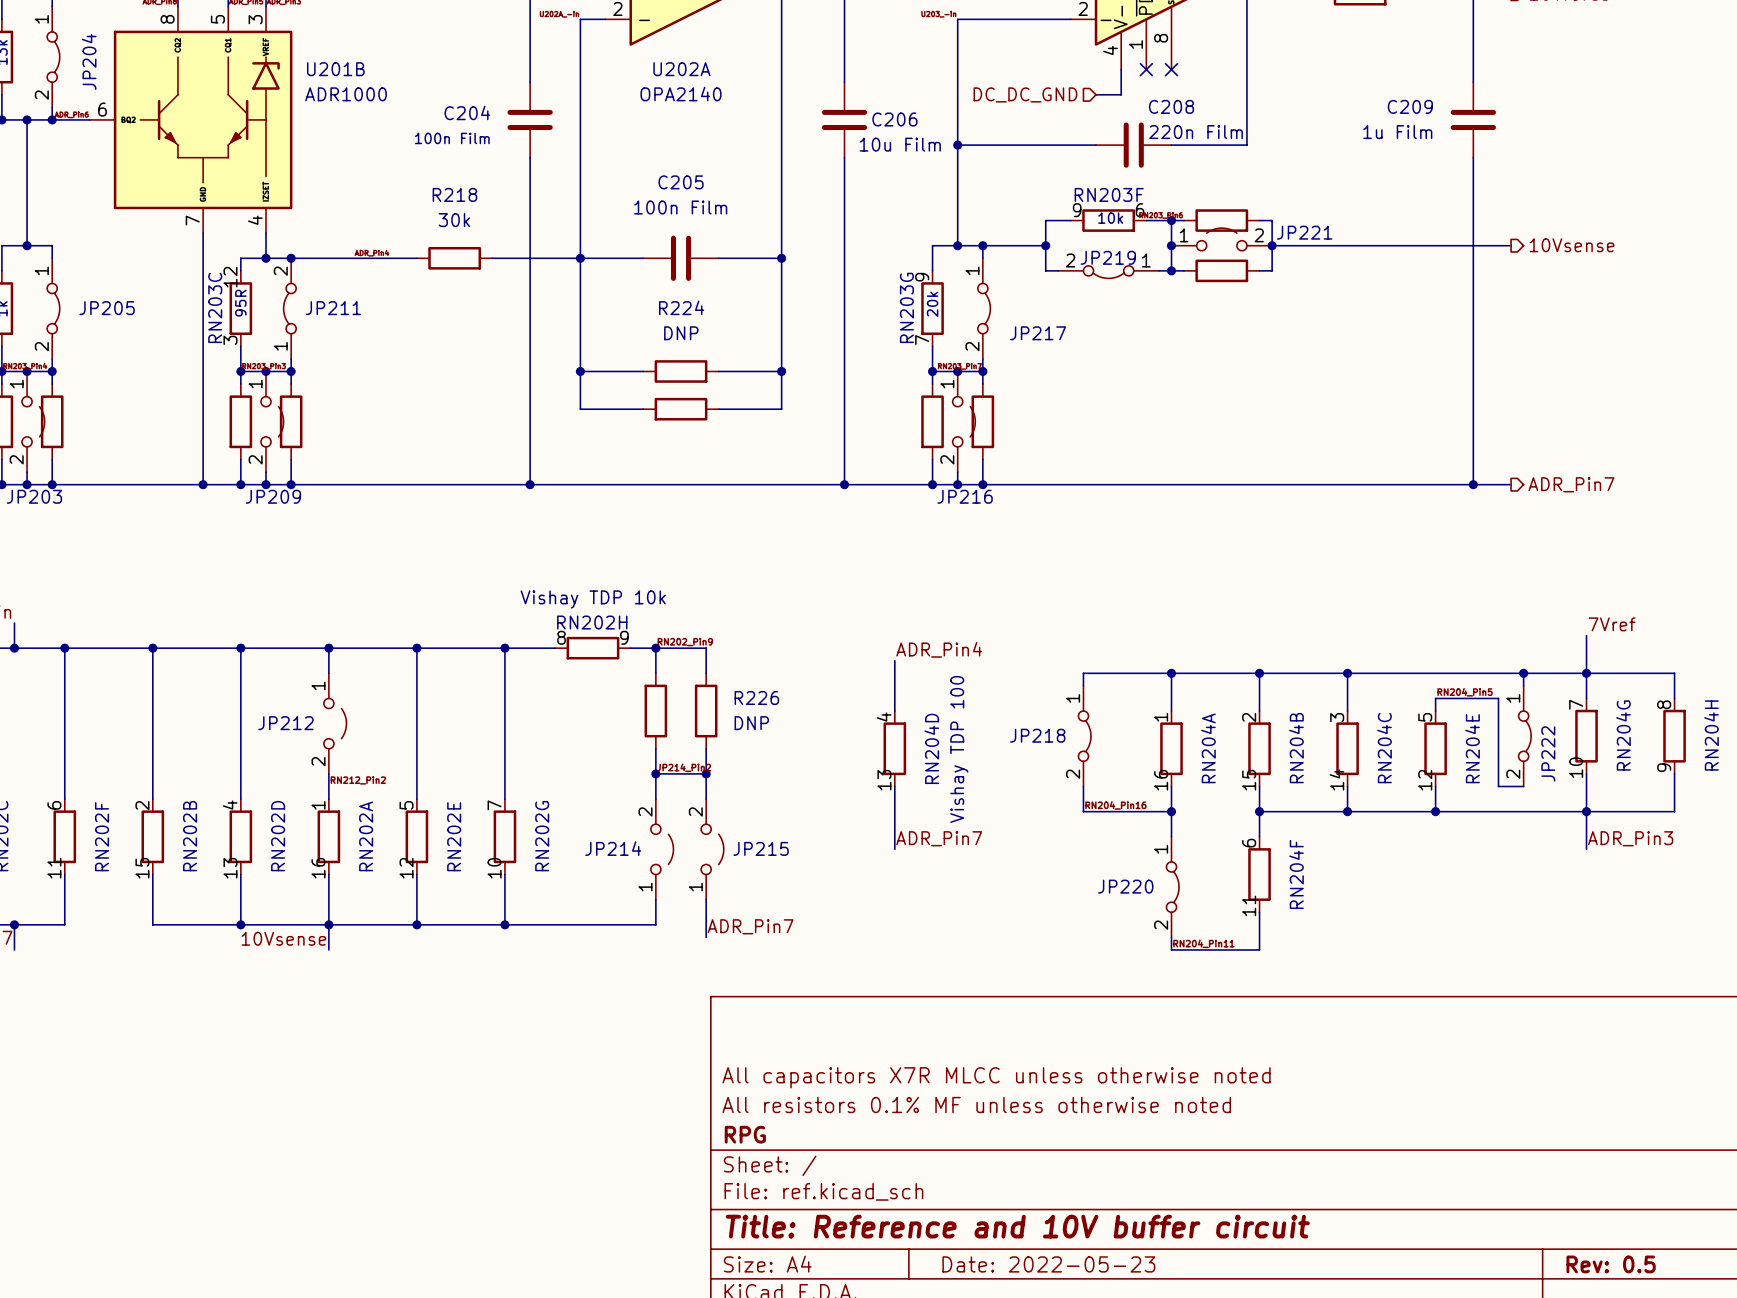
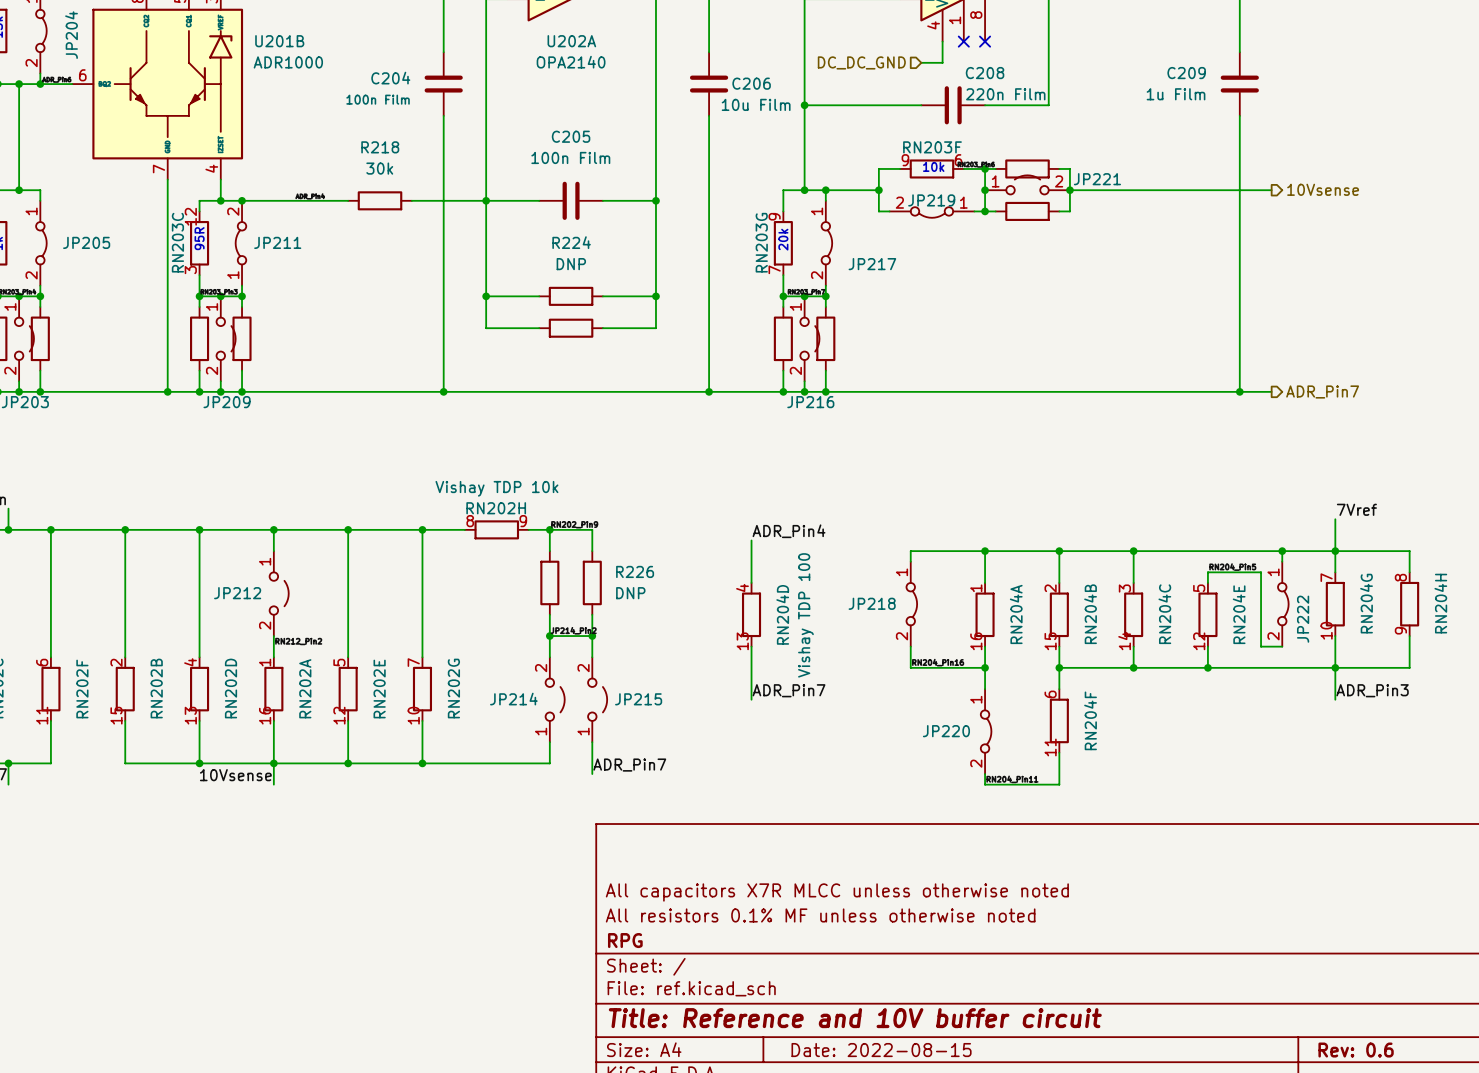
title block: Date: 2022-05-23 (1048, 1264) -> Date: 2022-08-15 (881, 1050)
title block: Rev: 0.5 (1611, 1264) -> Rev: 0.6 (1356, 1050)

